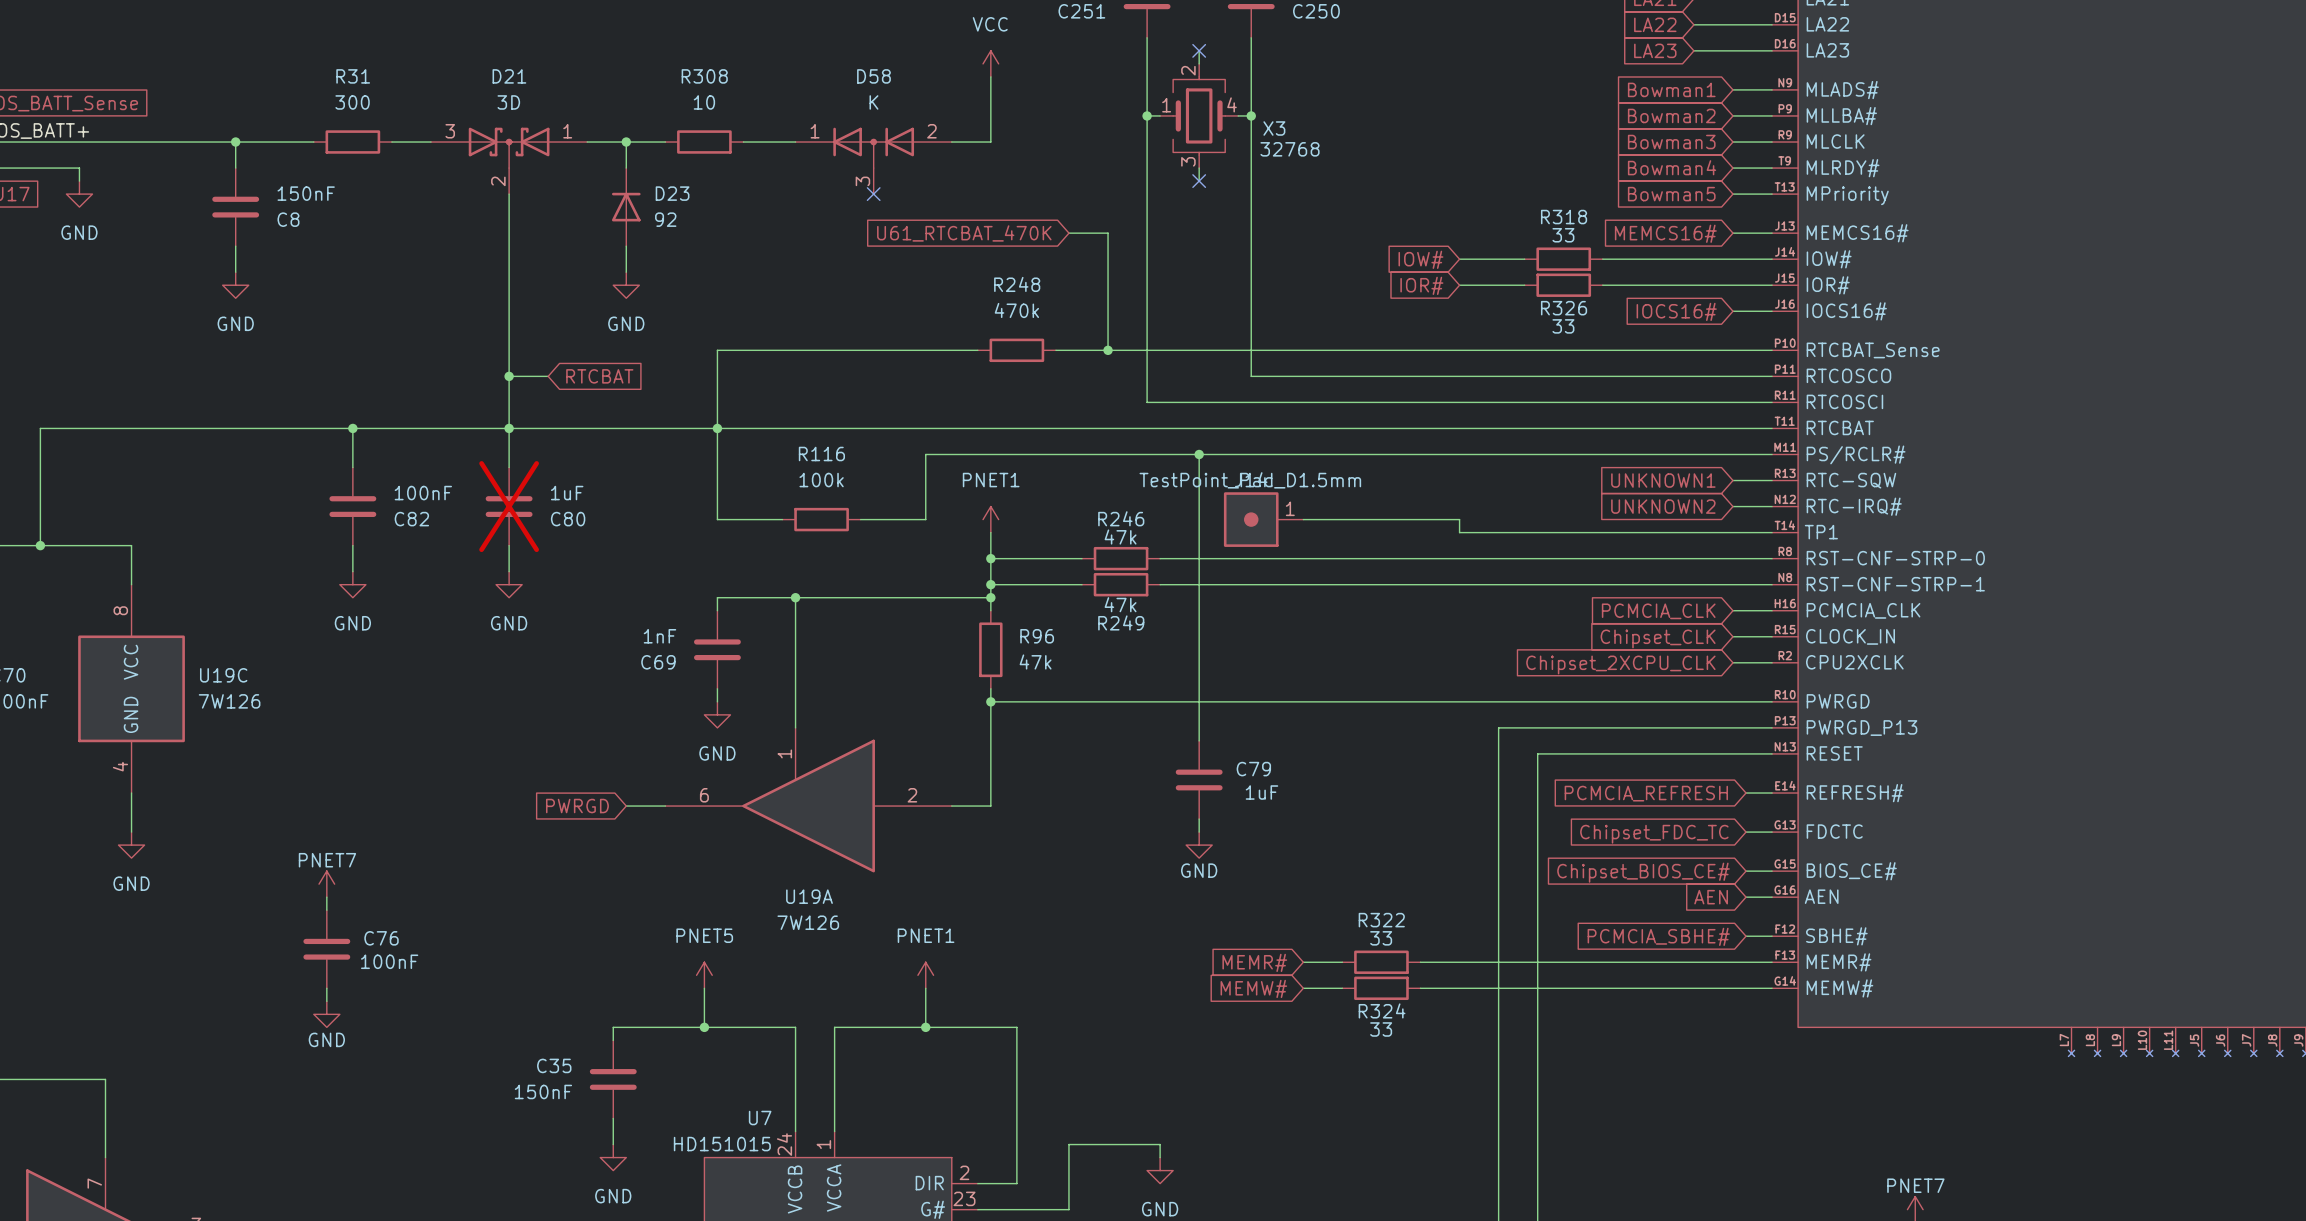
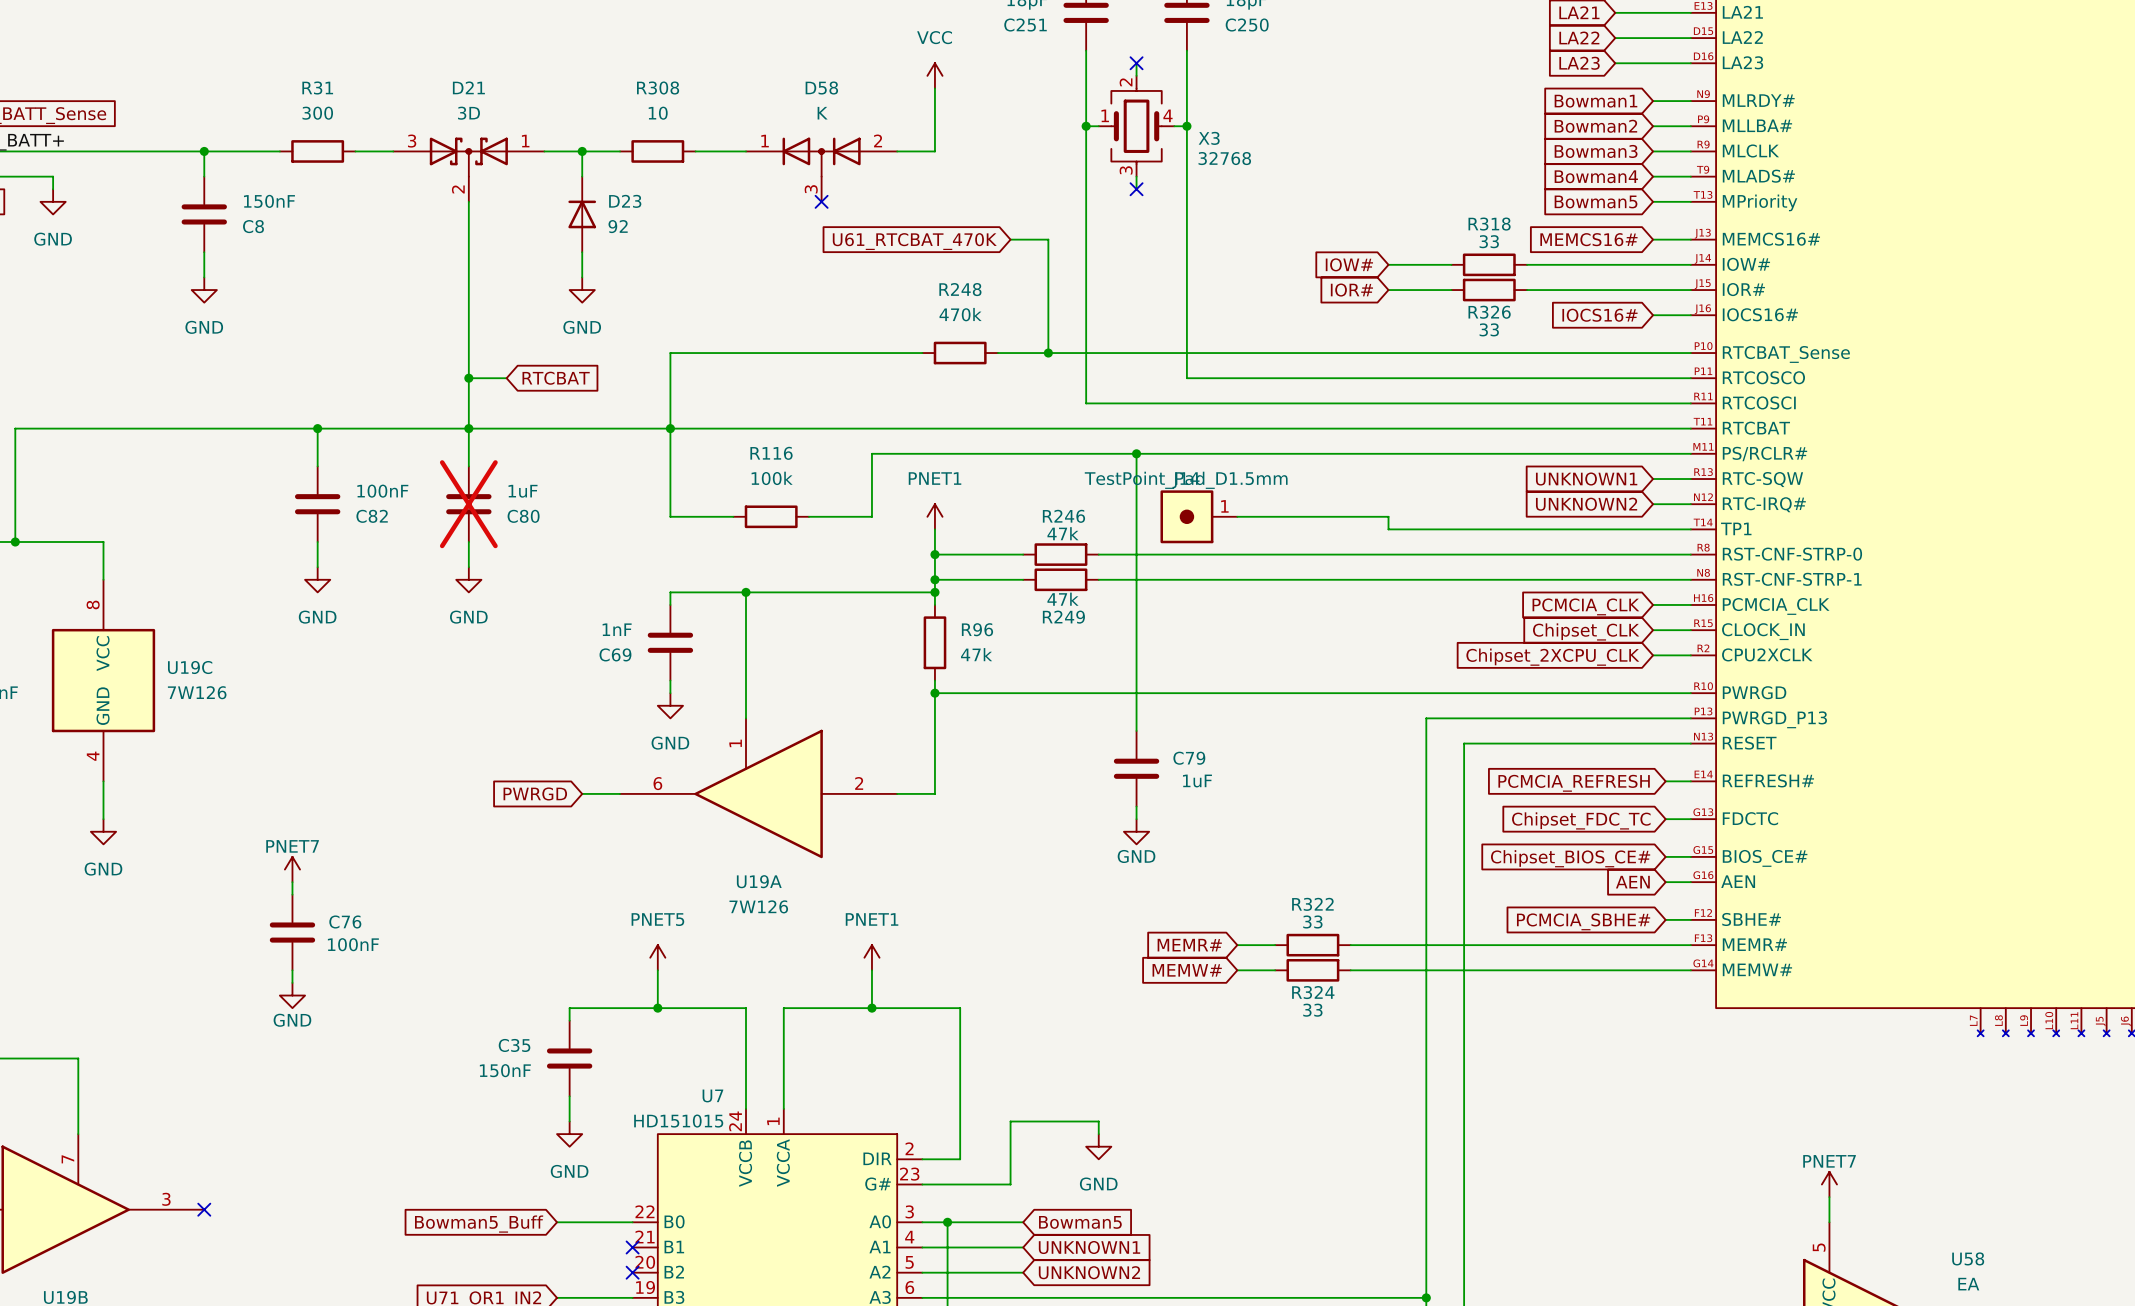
part pin name: MLADS# (1842, 90) -> MLRDY# (1758, 100)
part pin name: MLRDY# (1843, 168) -> MLADS# (1758, 176)

